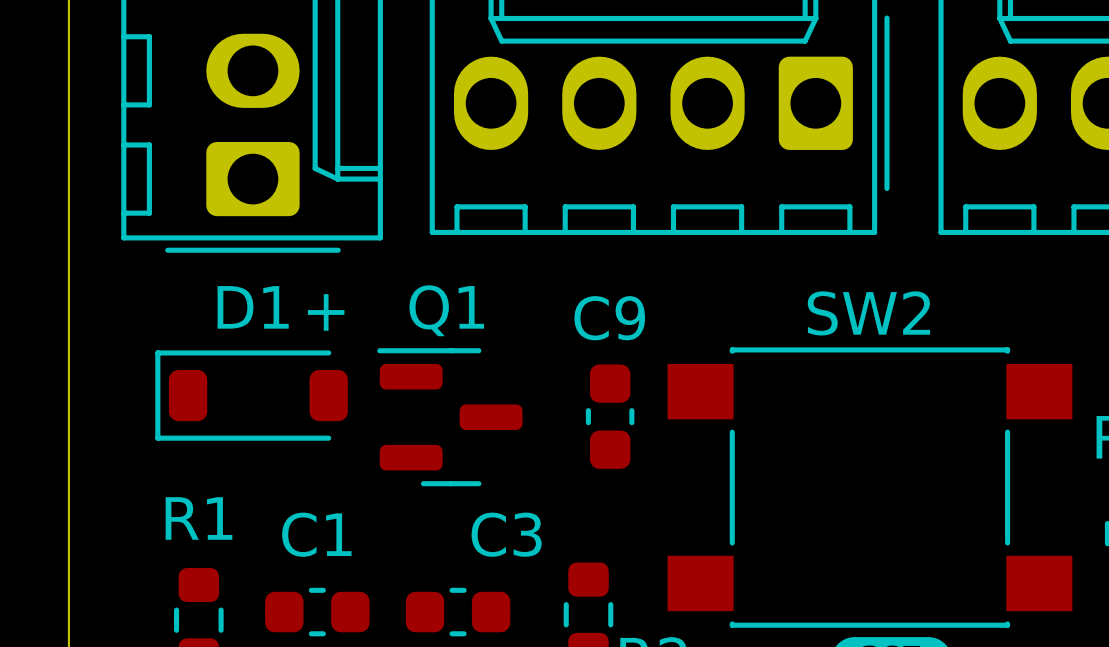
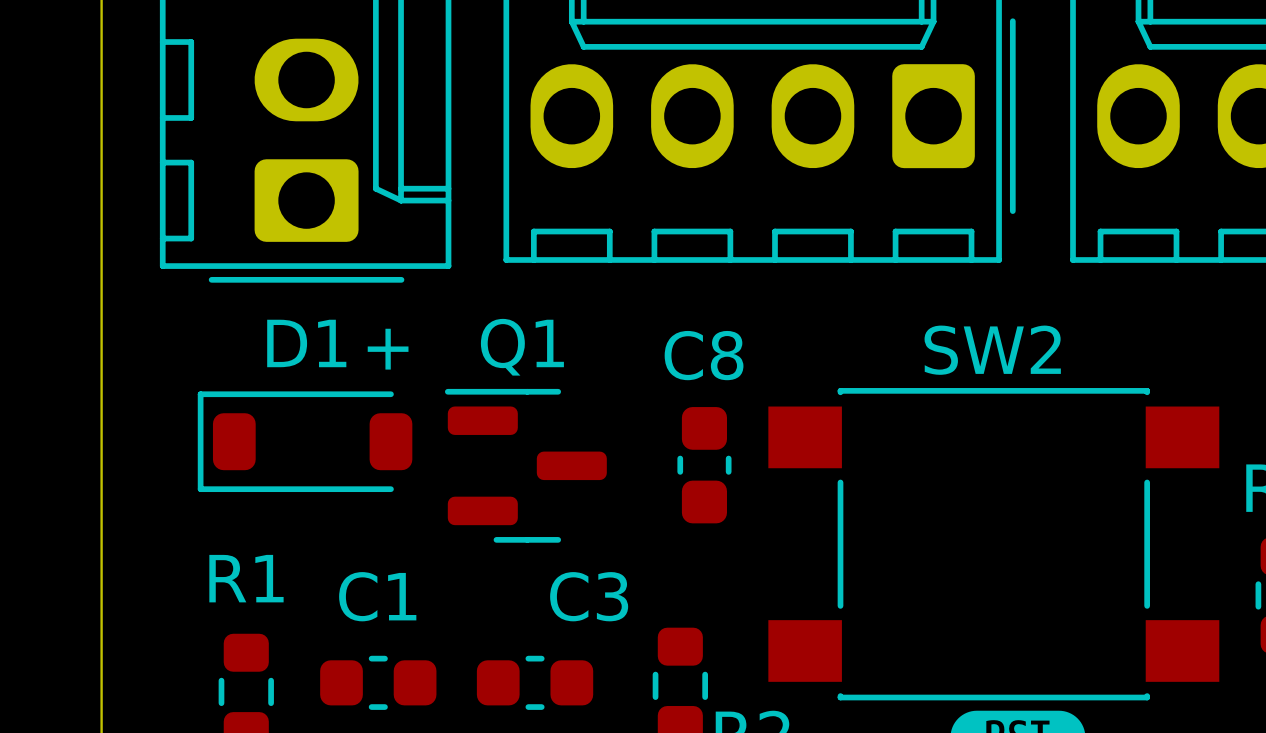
C9 name: C9 (609, 318) -> C8 (704, 355)

